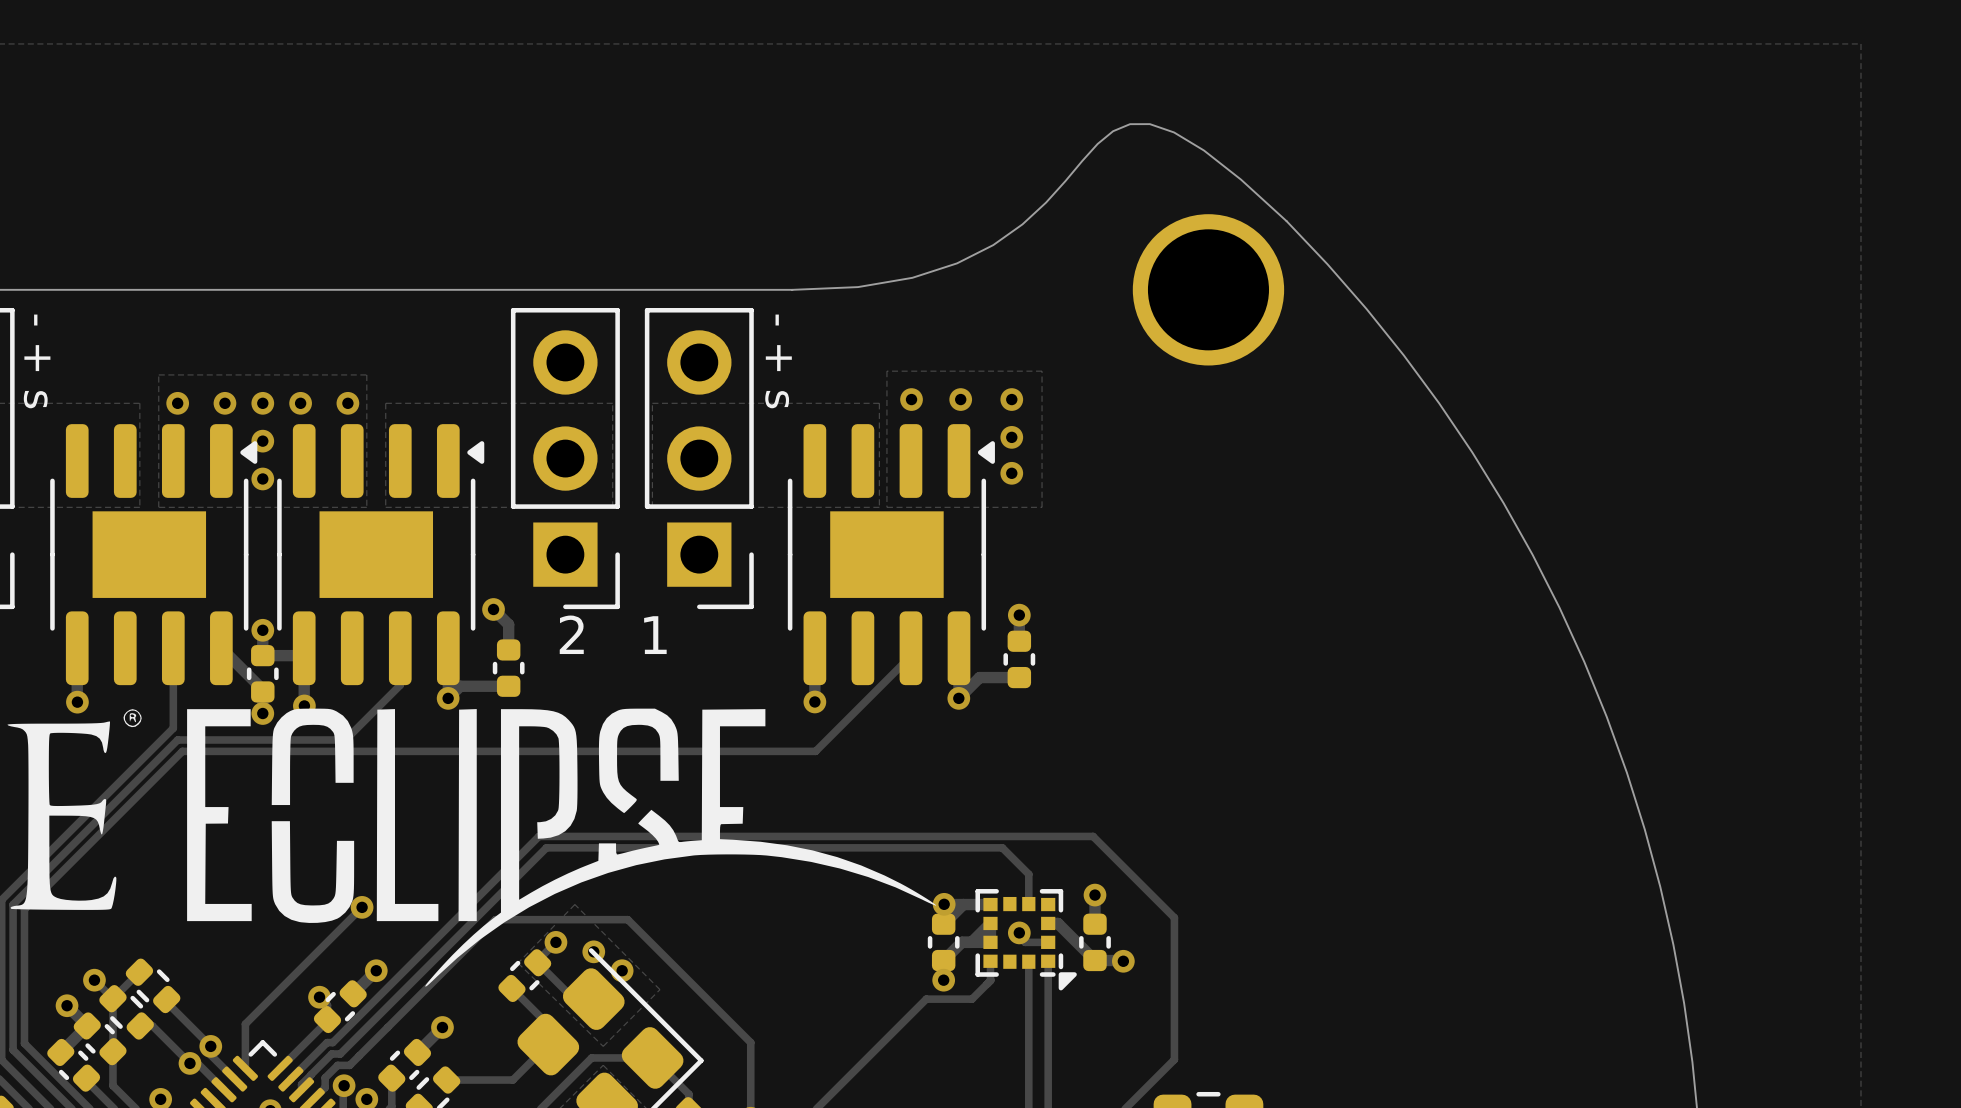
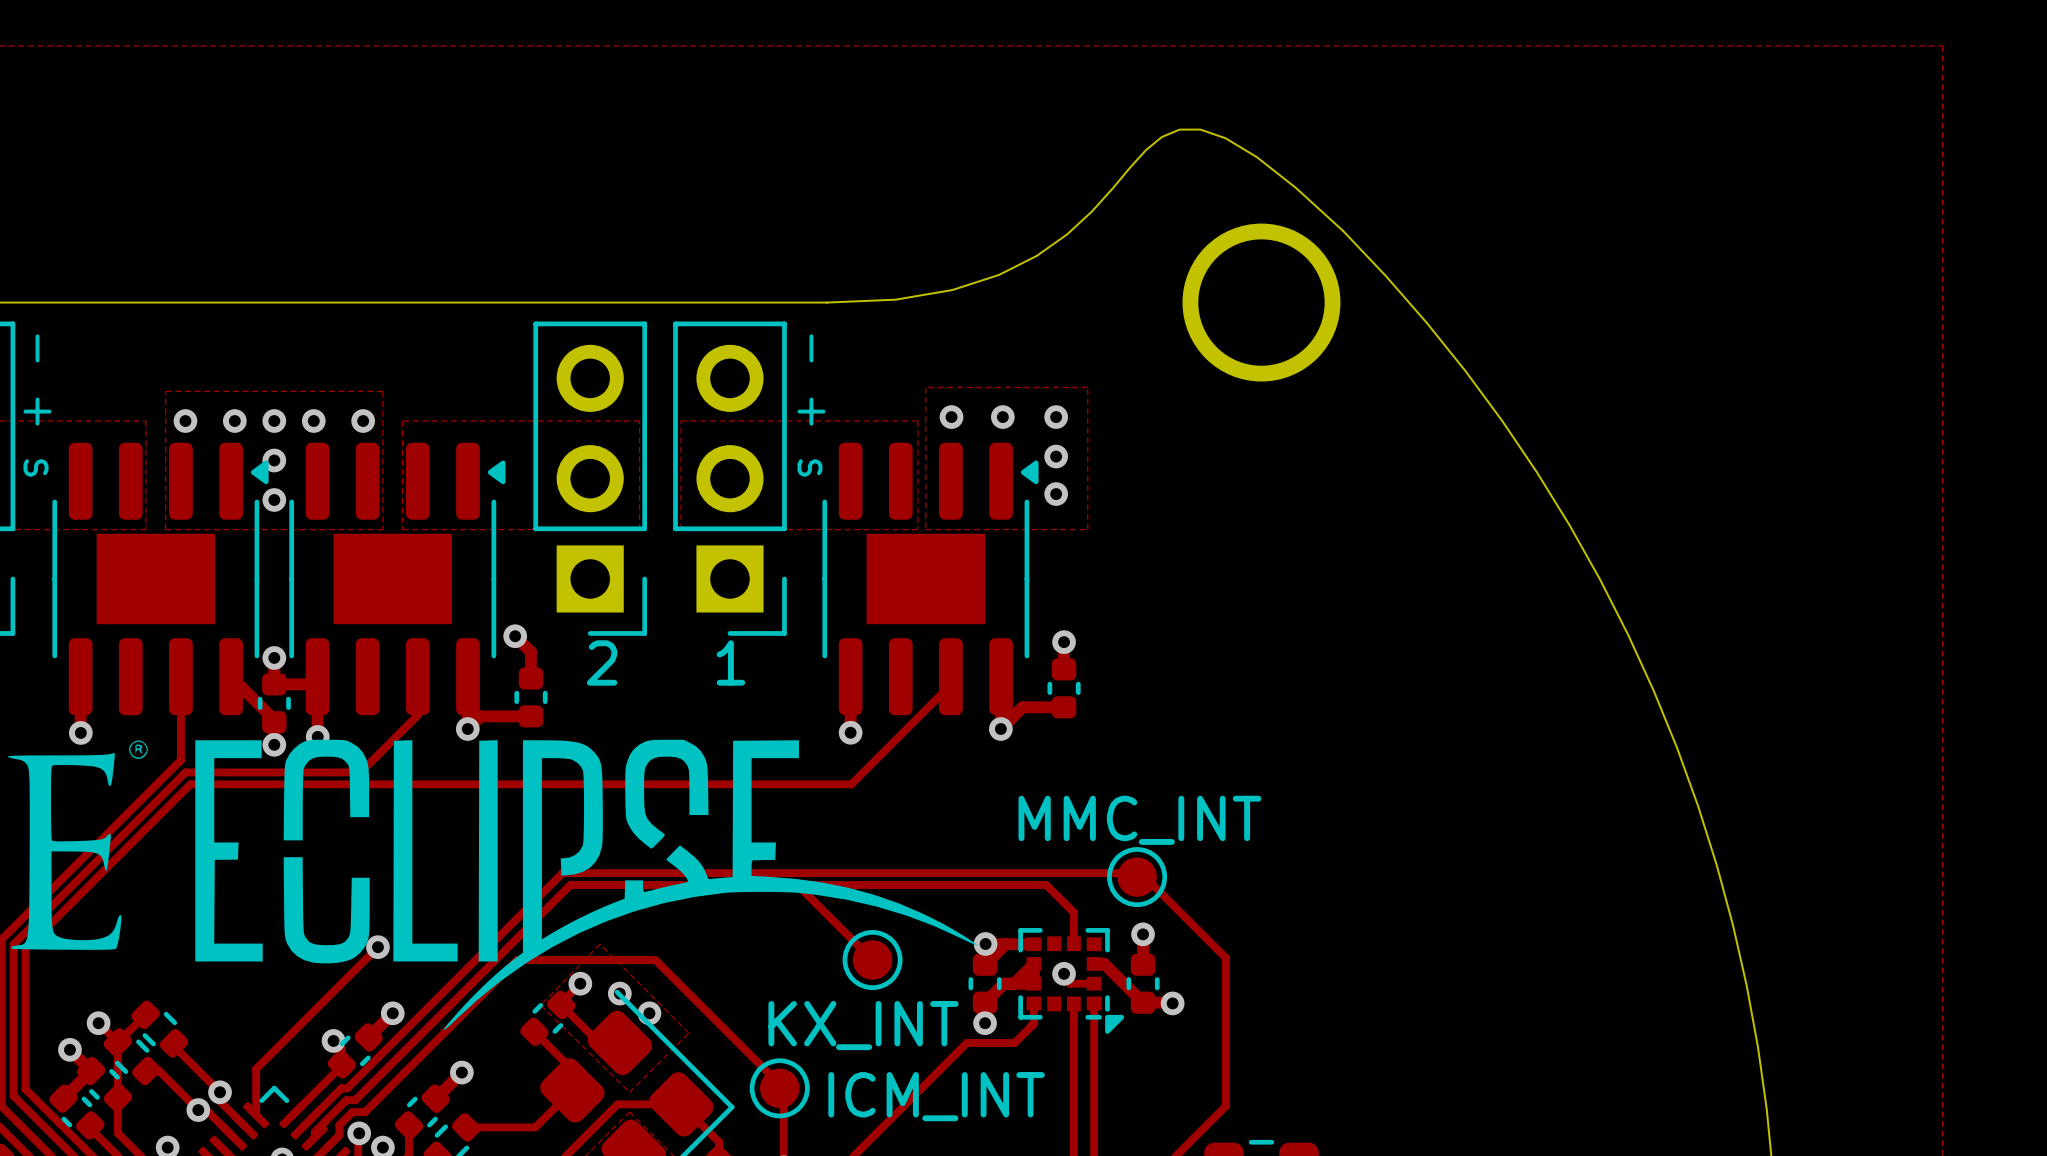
MMC_INT: none -> (1137, 877)
track: none -> (797, 885) (872, 960)
KX_INT: none -> (872, 960)
ICM_INT: none -> (779, 1088)

